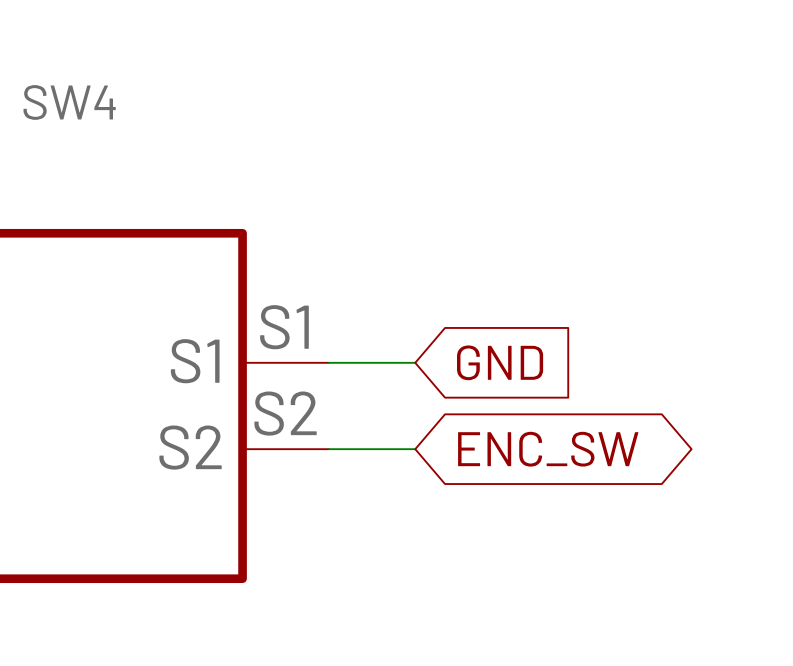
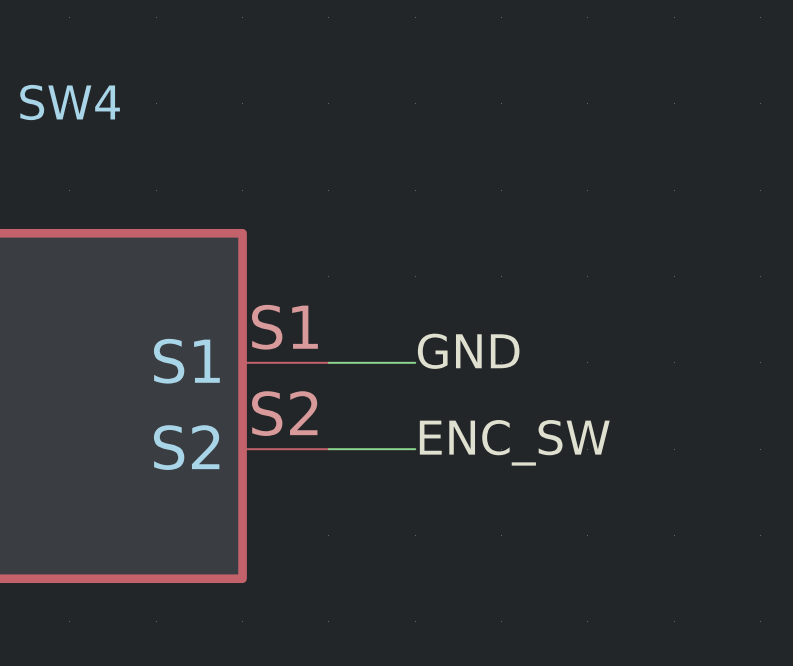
label: none -> GND (468, 351)
global label: GND (500, 362) -> none
label: none -> ENC_SW (514, 442)
global label: ENC_SW (548, 449) -> none

